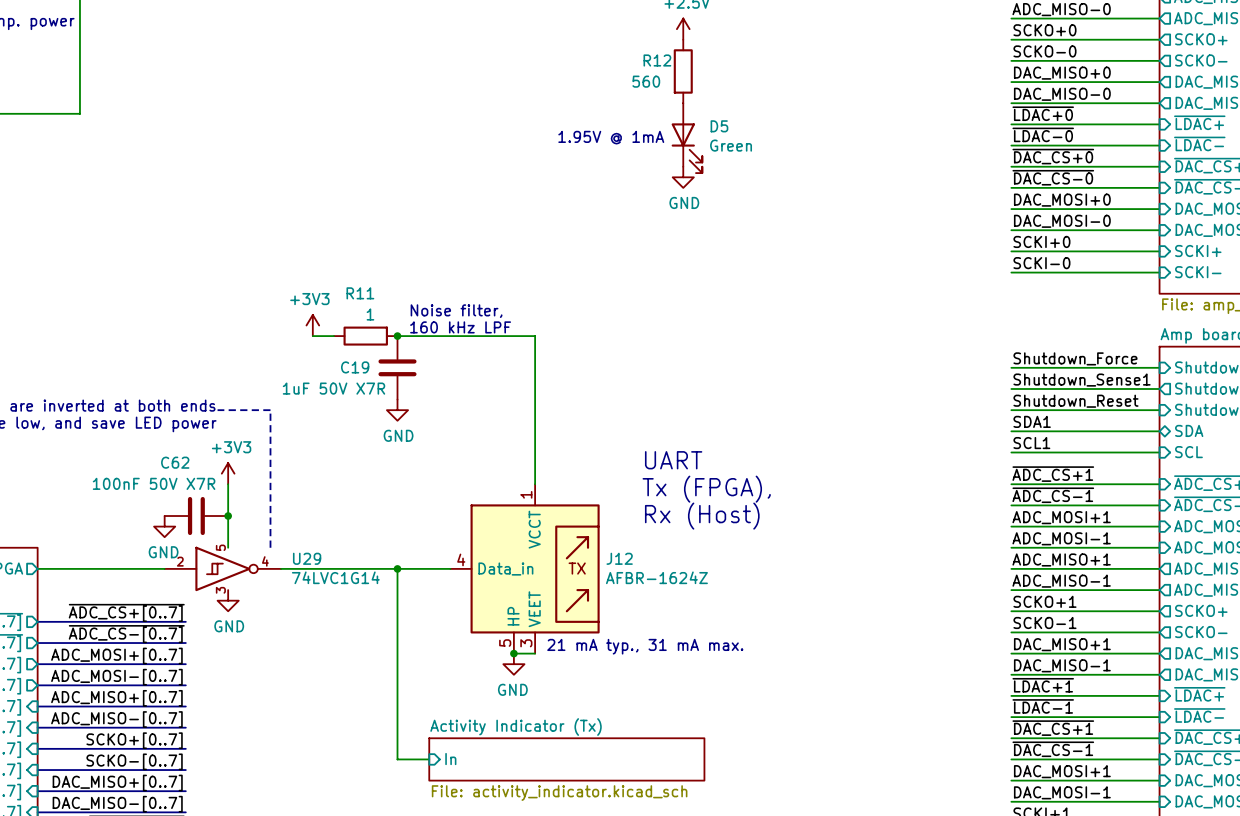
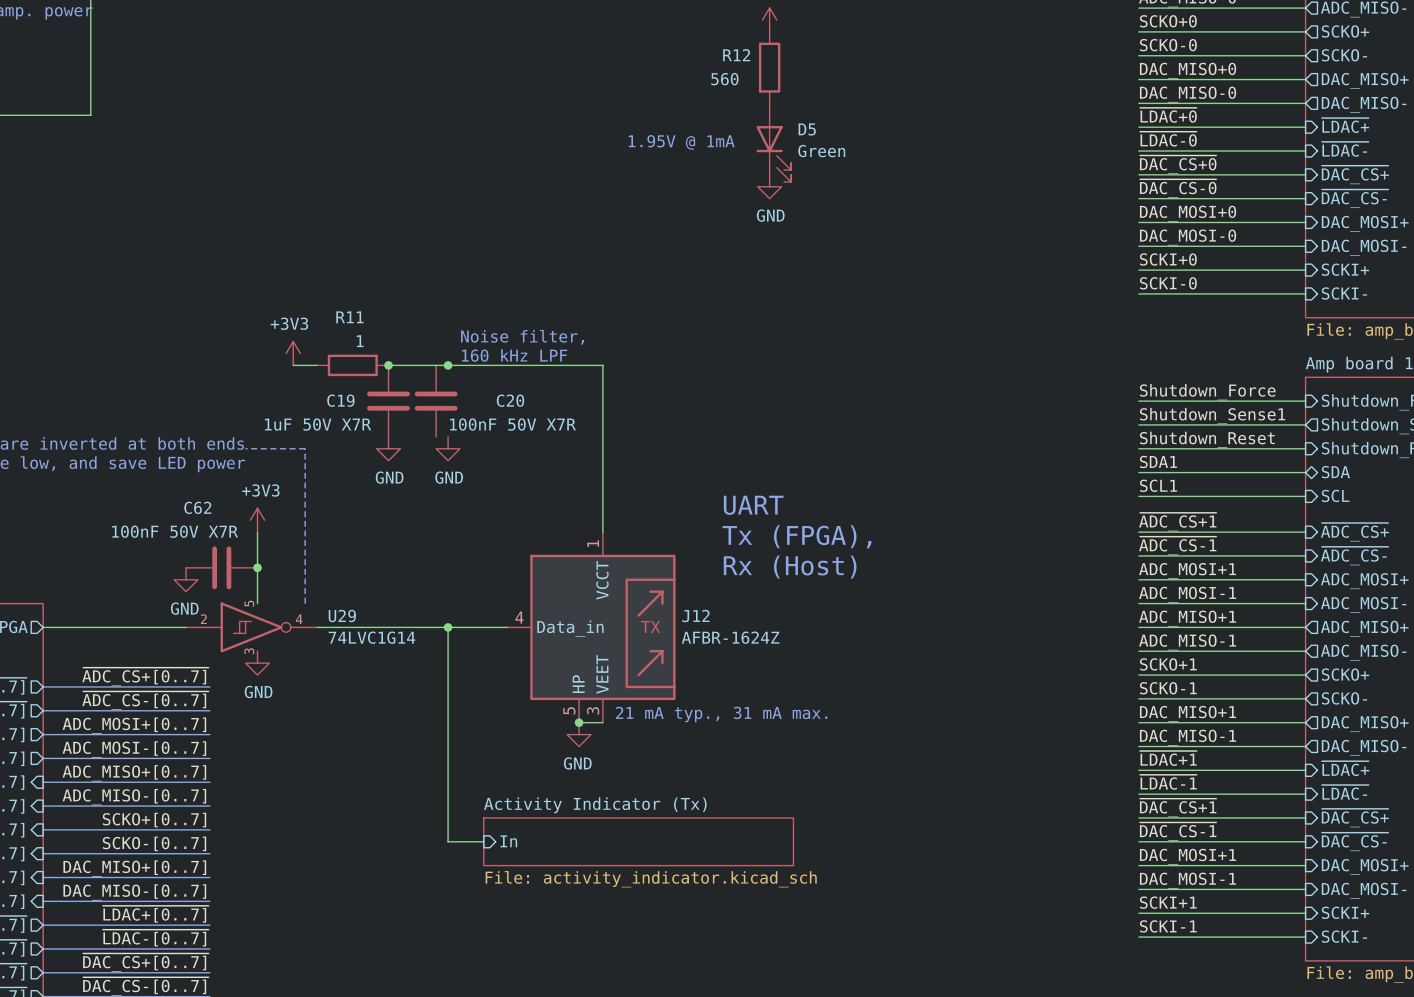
power symbol position: +3V3 (312, 325) -> +3V3 (293, 353)
wire: (312, 336) (333, 336) -> (293, 365) (317, 365)
wire: none -> (388, 365) (448, 365)
junction: none -> (388, 365)
R11 position: (365, 336) -> (352, 365)
C20: none -> 100nF 50V X7R (436, 401)
C19 position: (397, 367) -> (388, 401)
power symbol: none -> GND (388, 448)

